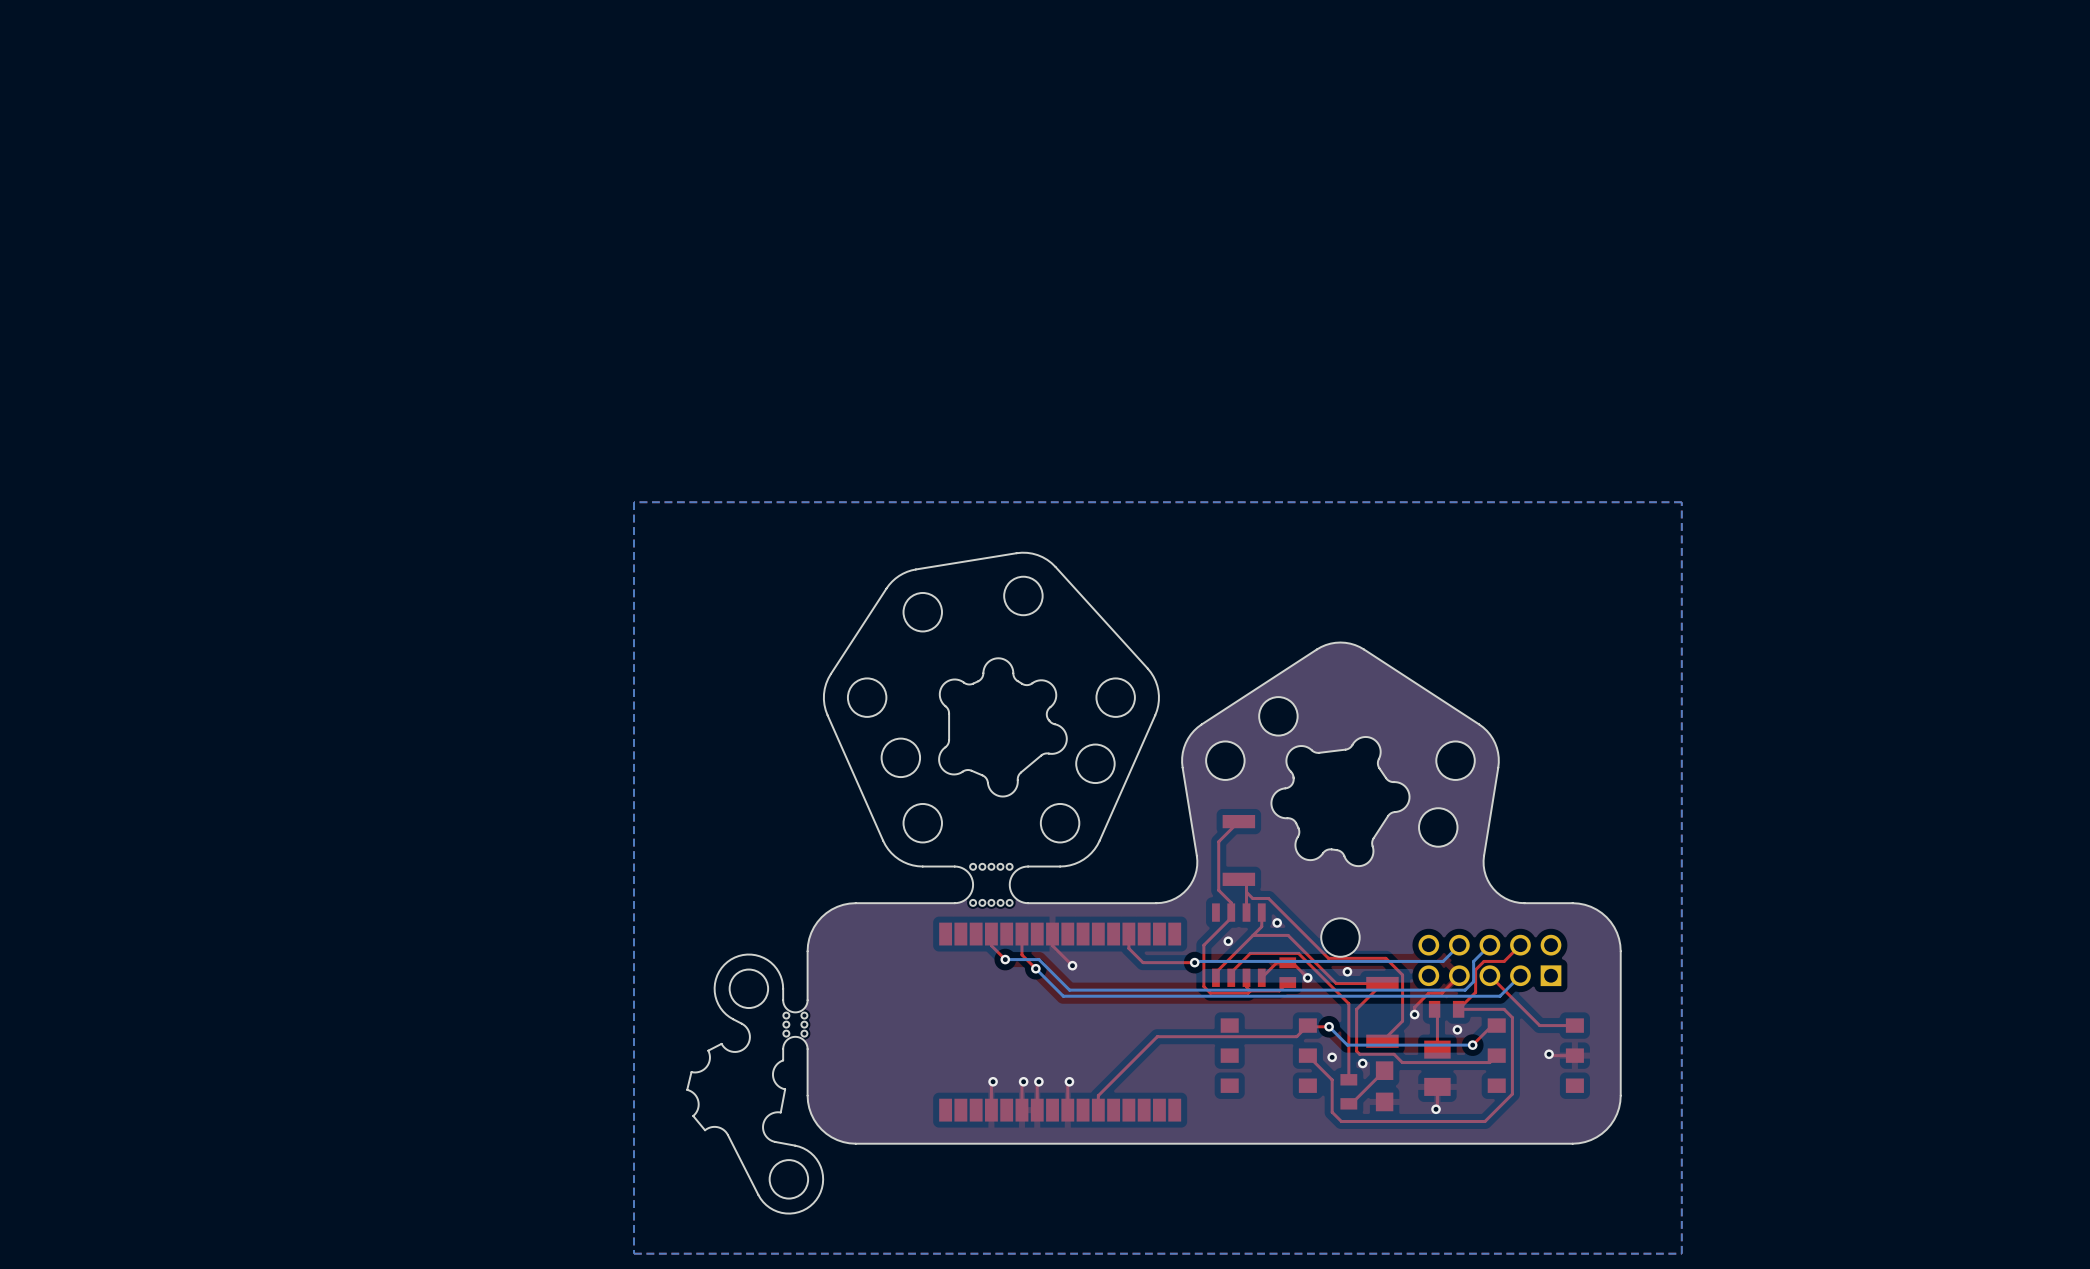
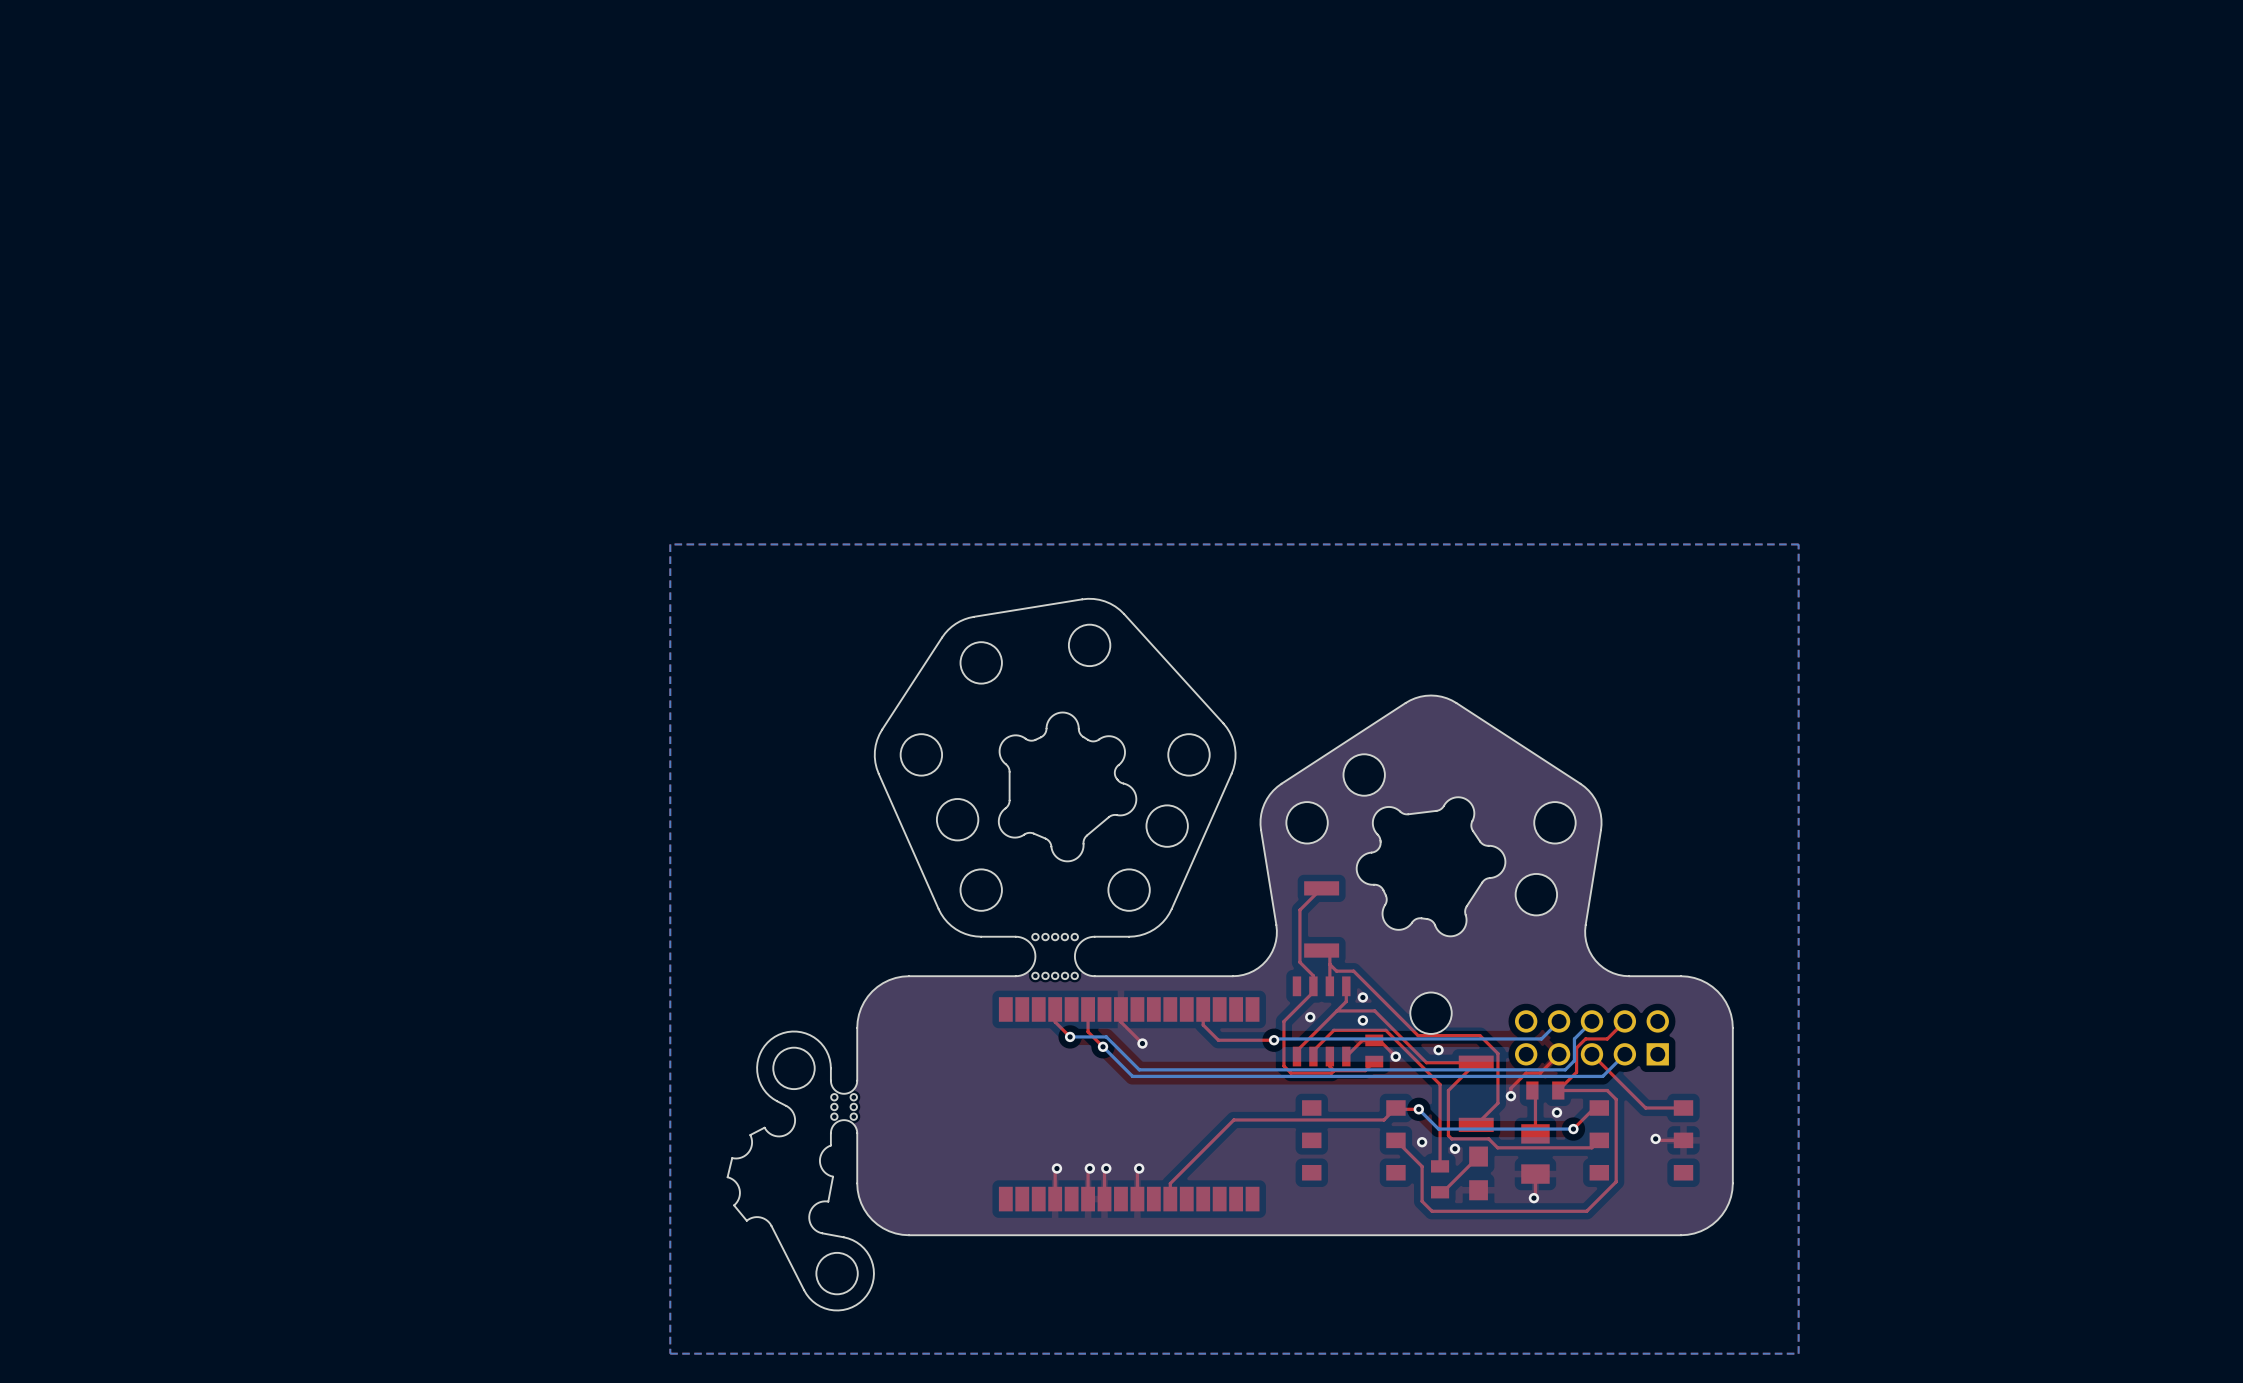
via: none -> (1362, 1020)

